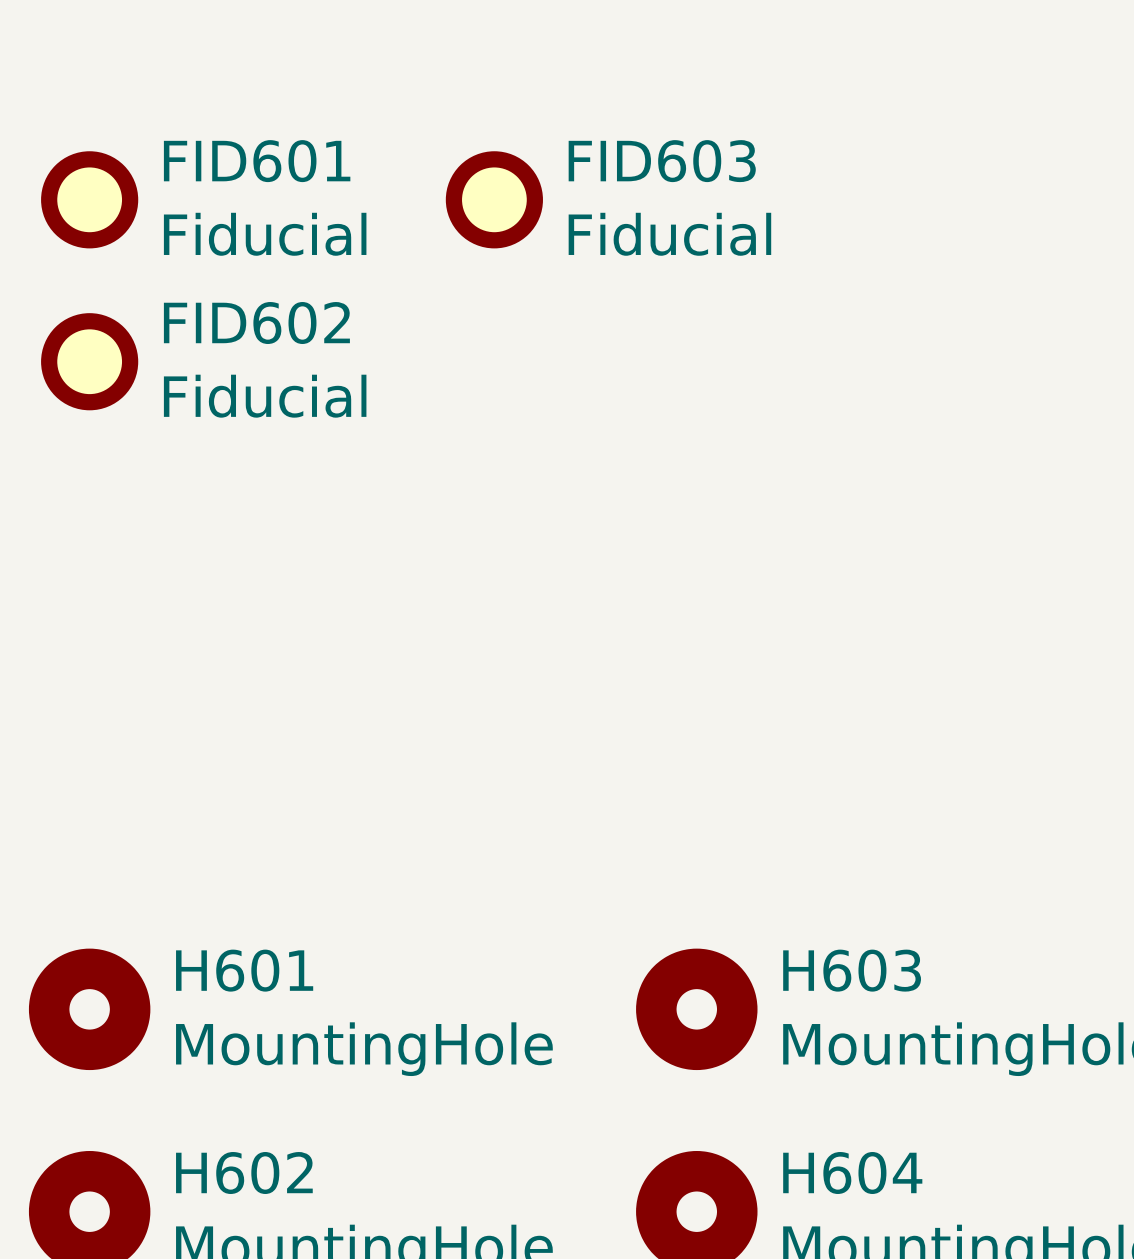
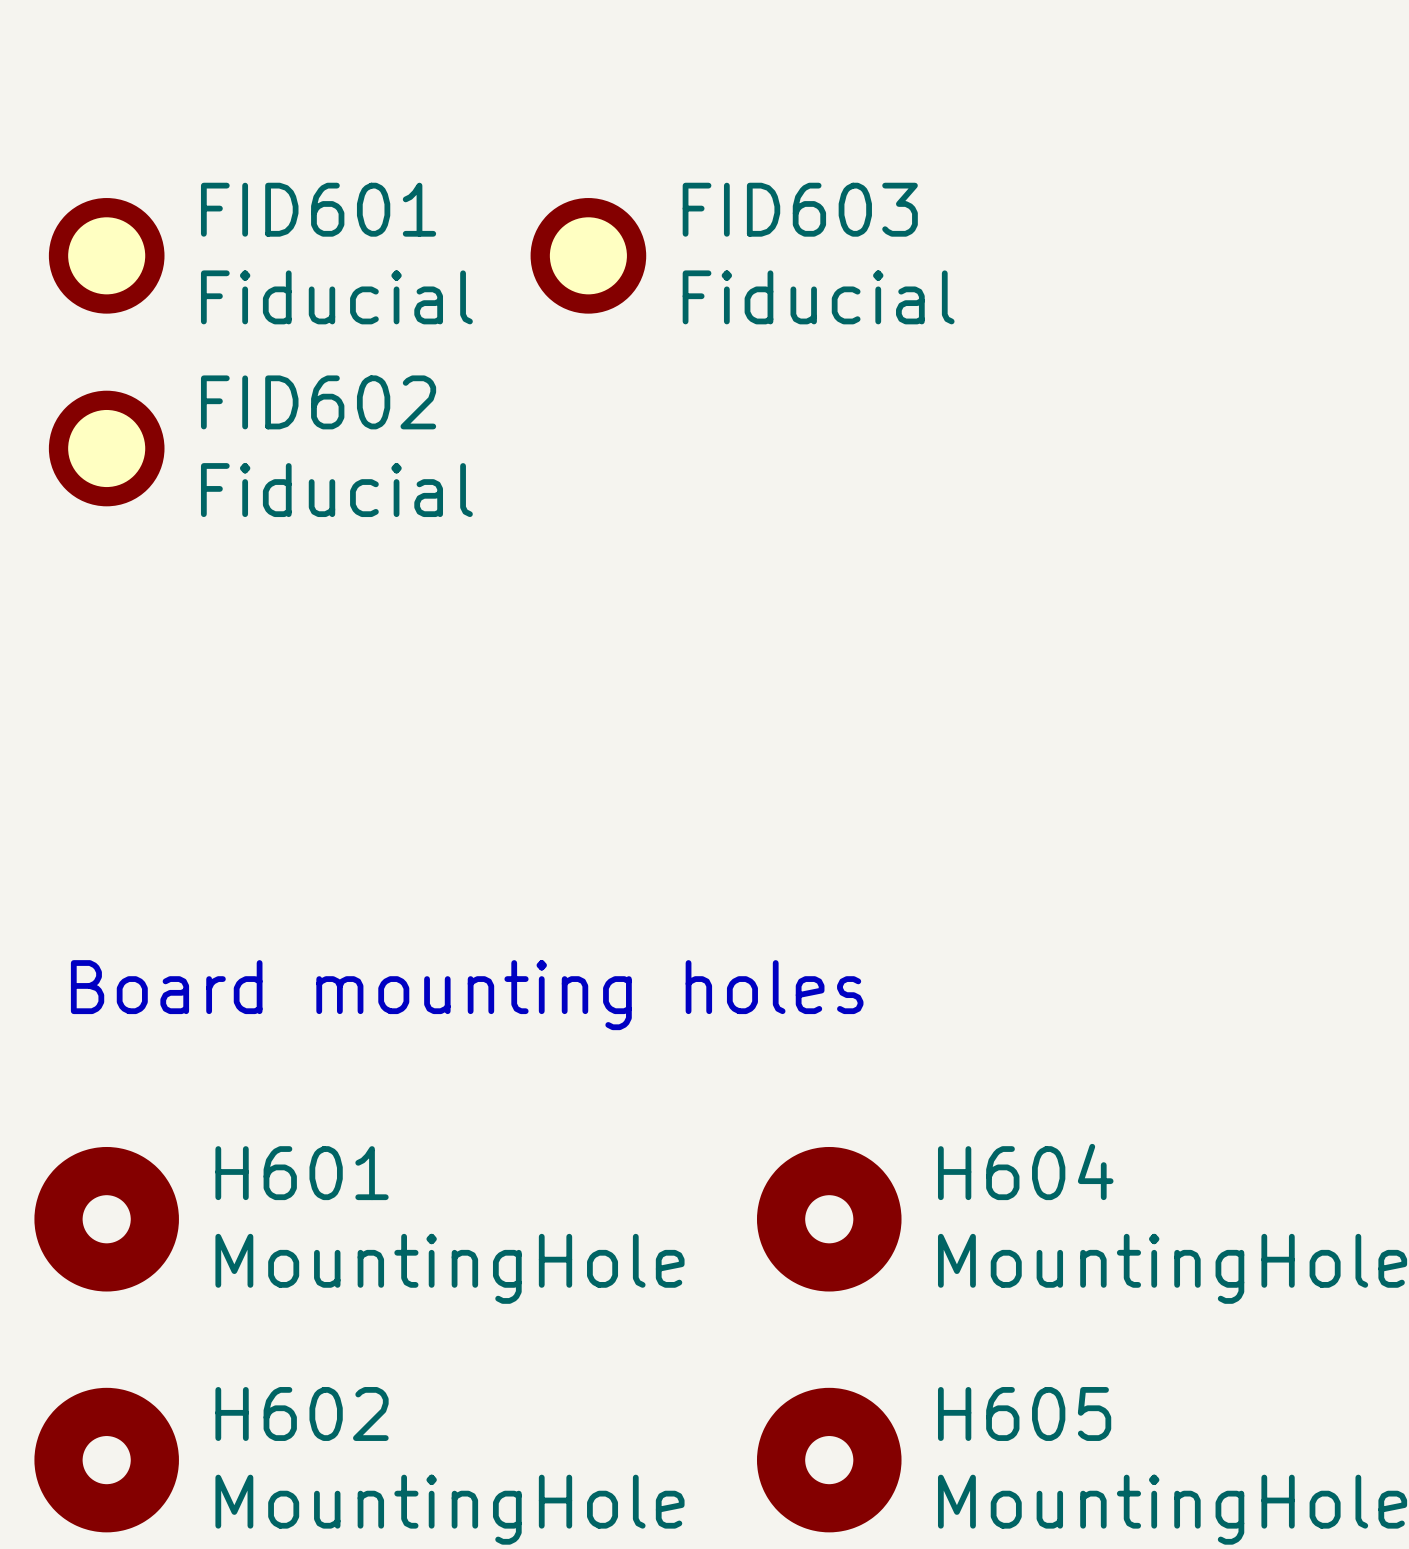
text: none -> Board mounting holes (467, 995)
H603 name: H603 (852, 970) -> H604 (1025, 1171)
H604 name: H604 (852, 1173) -> H605 (1024, 1413)

